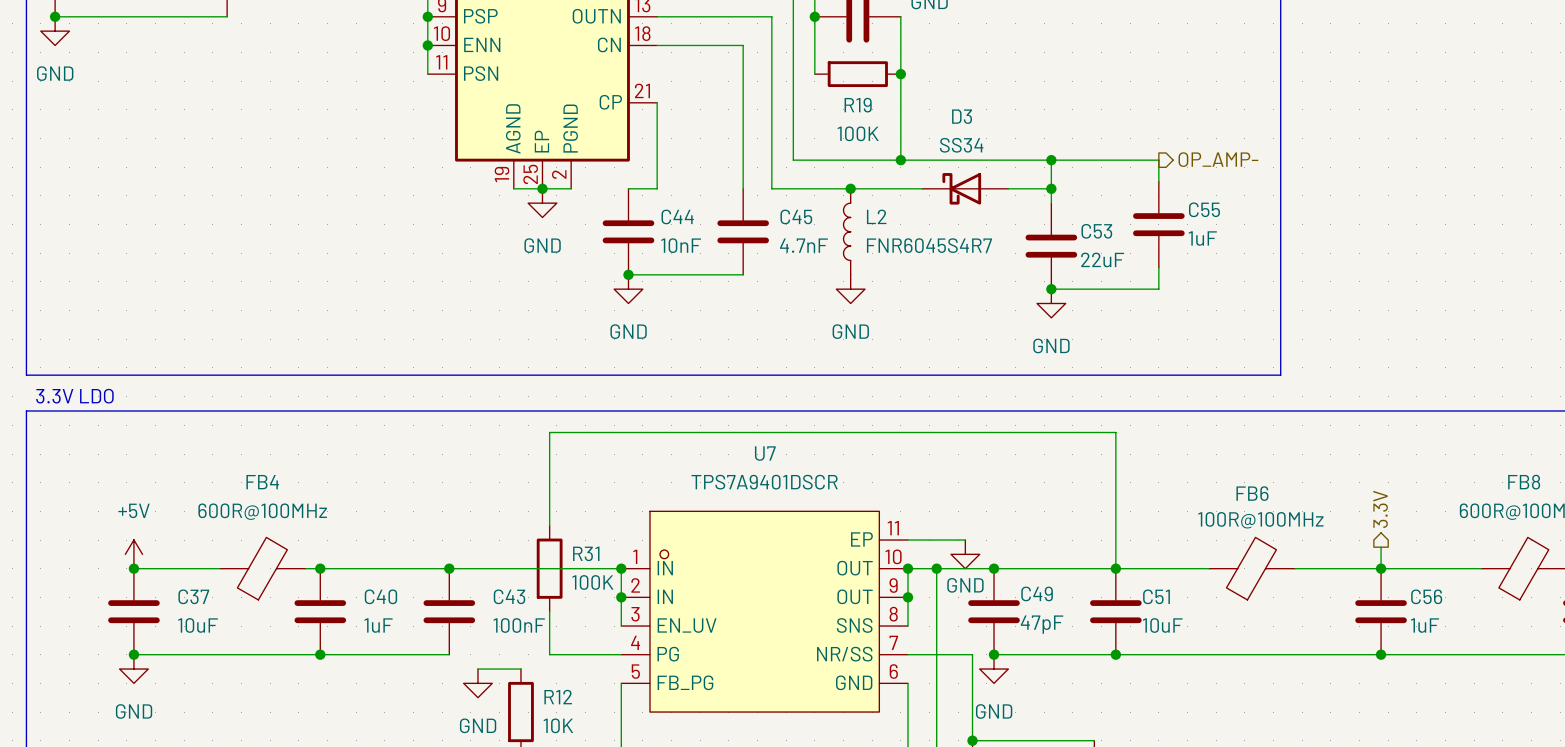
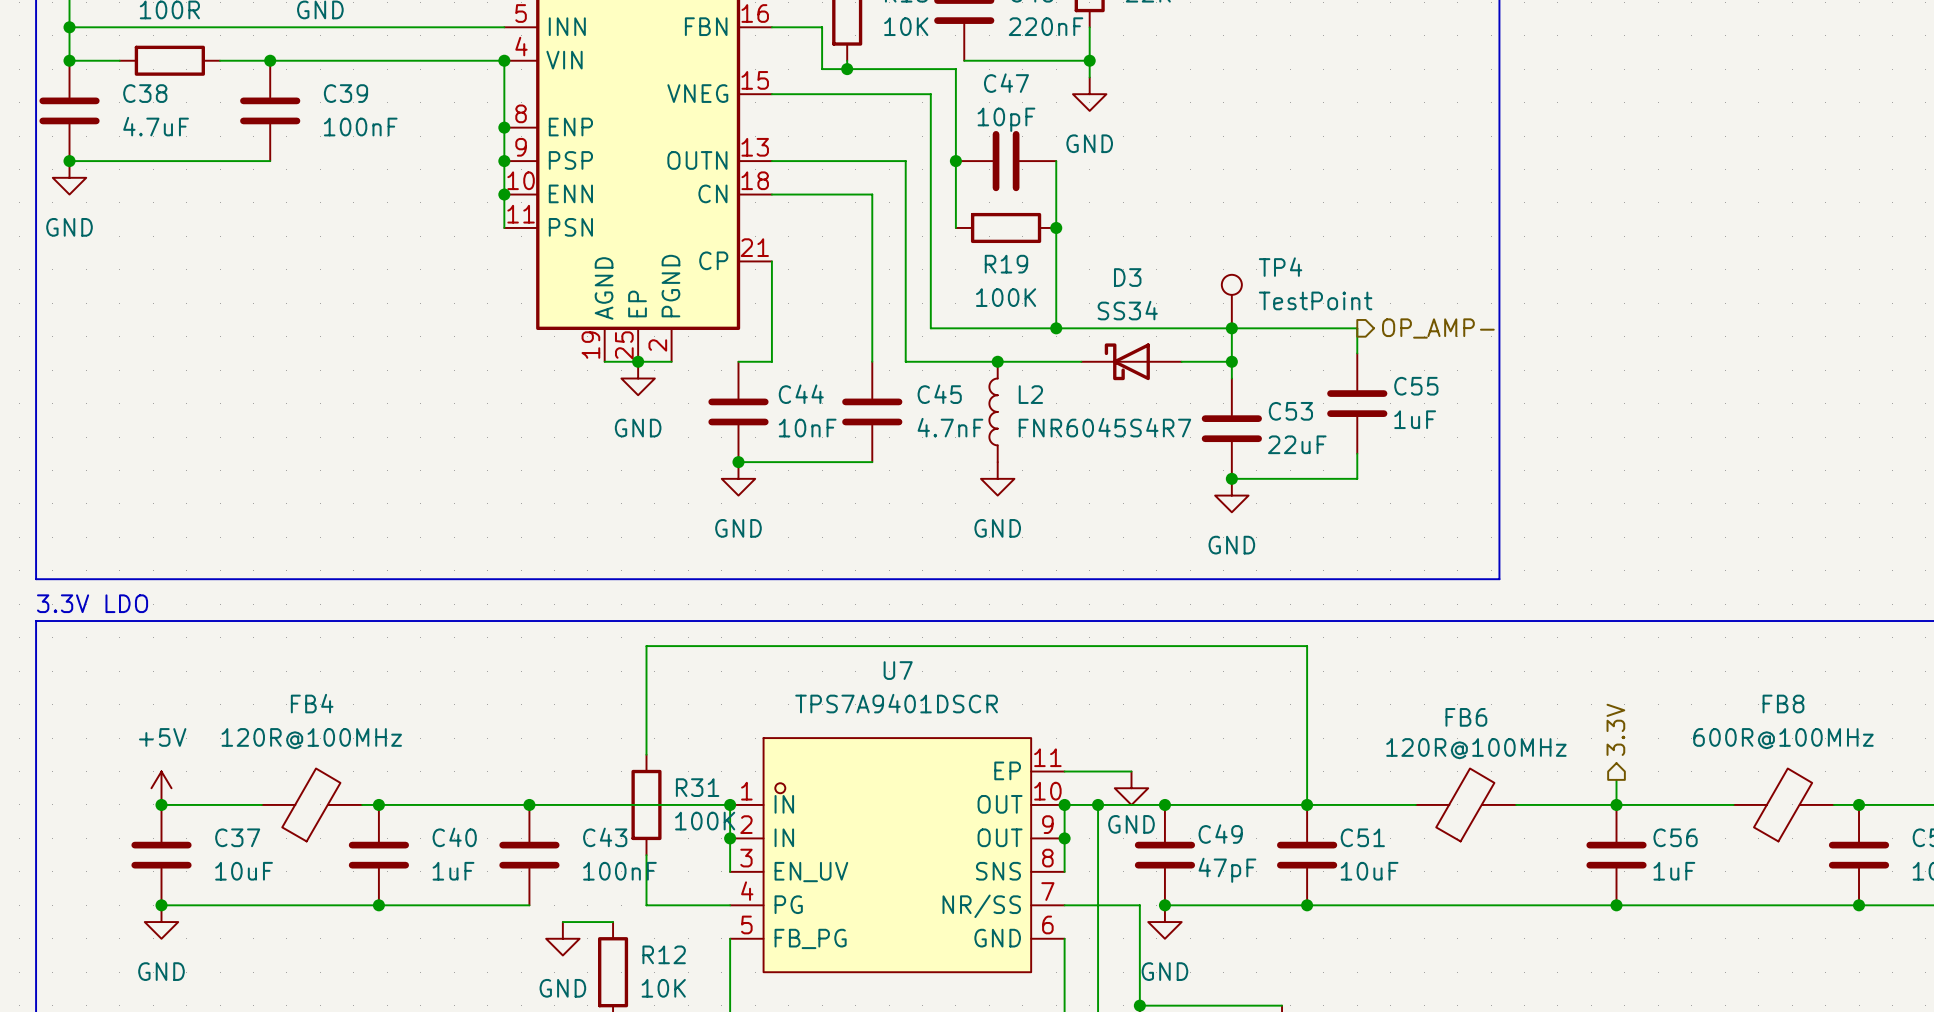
TP4: none -> TestPoint (1231, 301)
FB4 value: 600R@100MHz (262, 511) -> 120R@100MHz (311, 738)
FB6 value: 100R@100MHz (1260, 520) -> 120R@100MHz (1476, 748)

